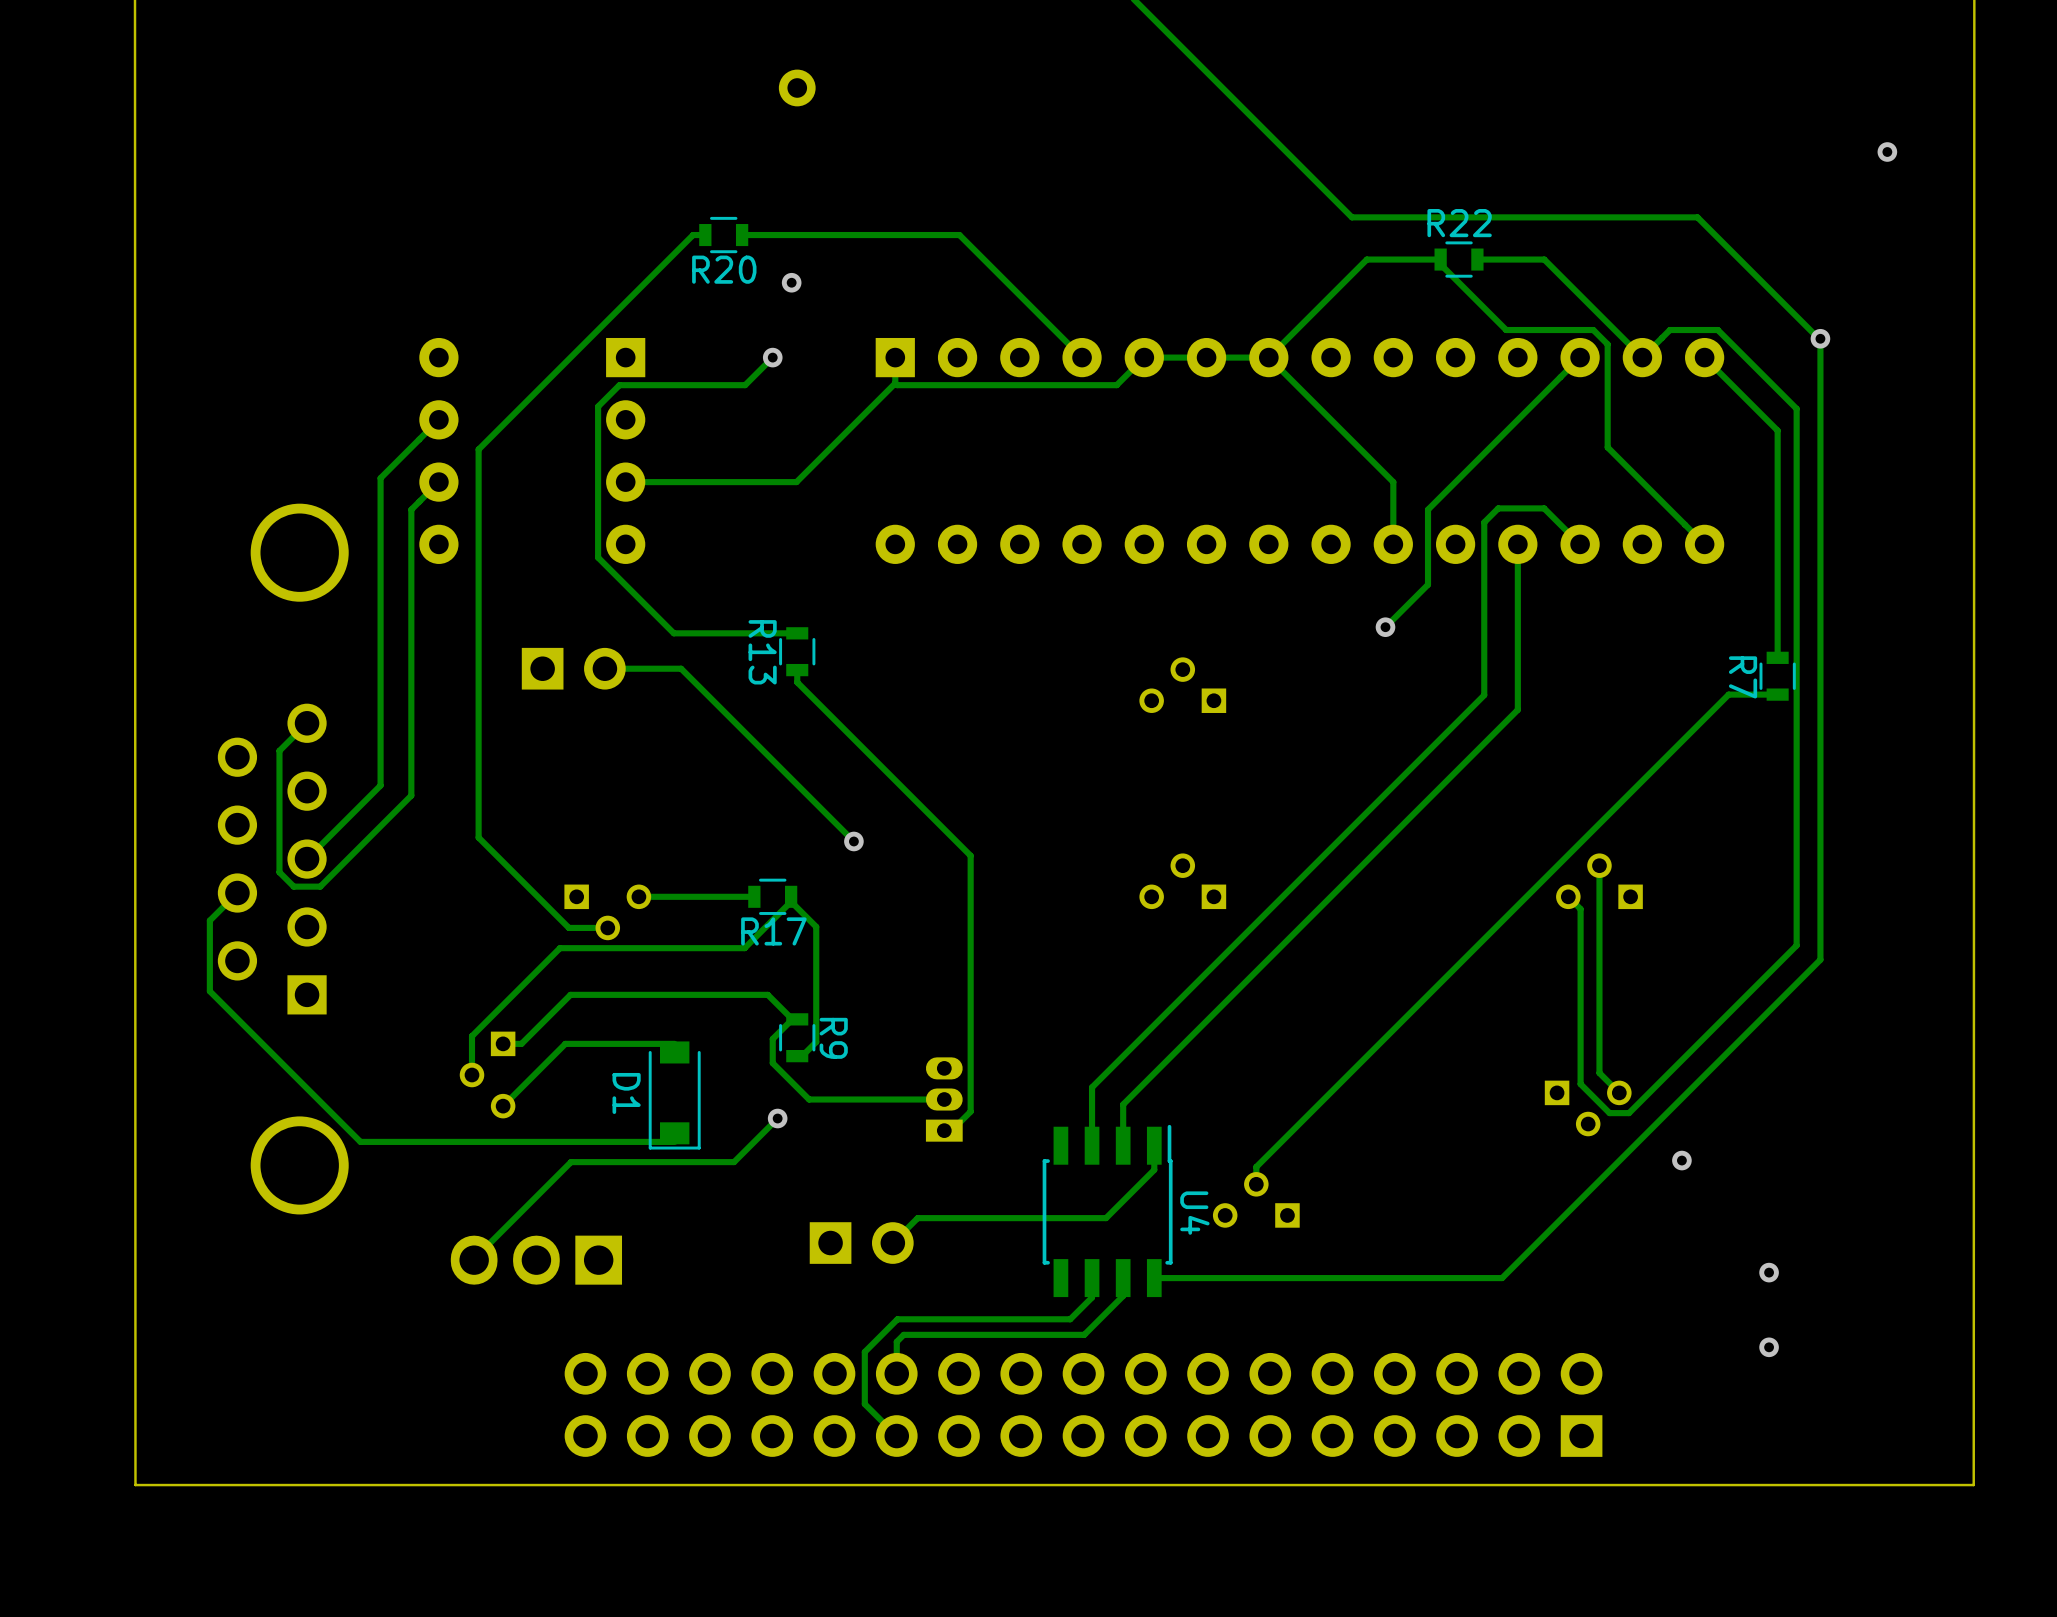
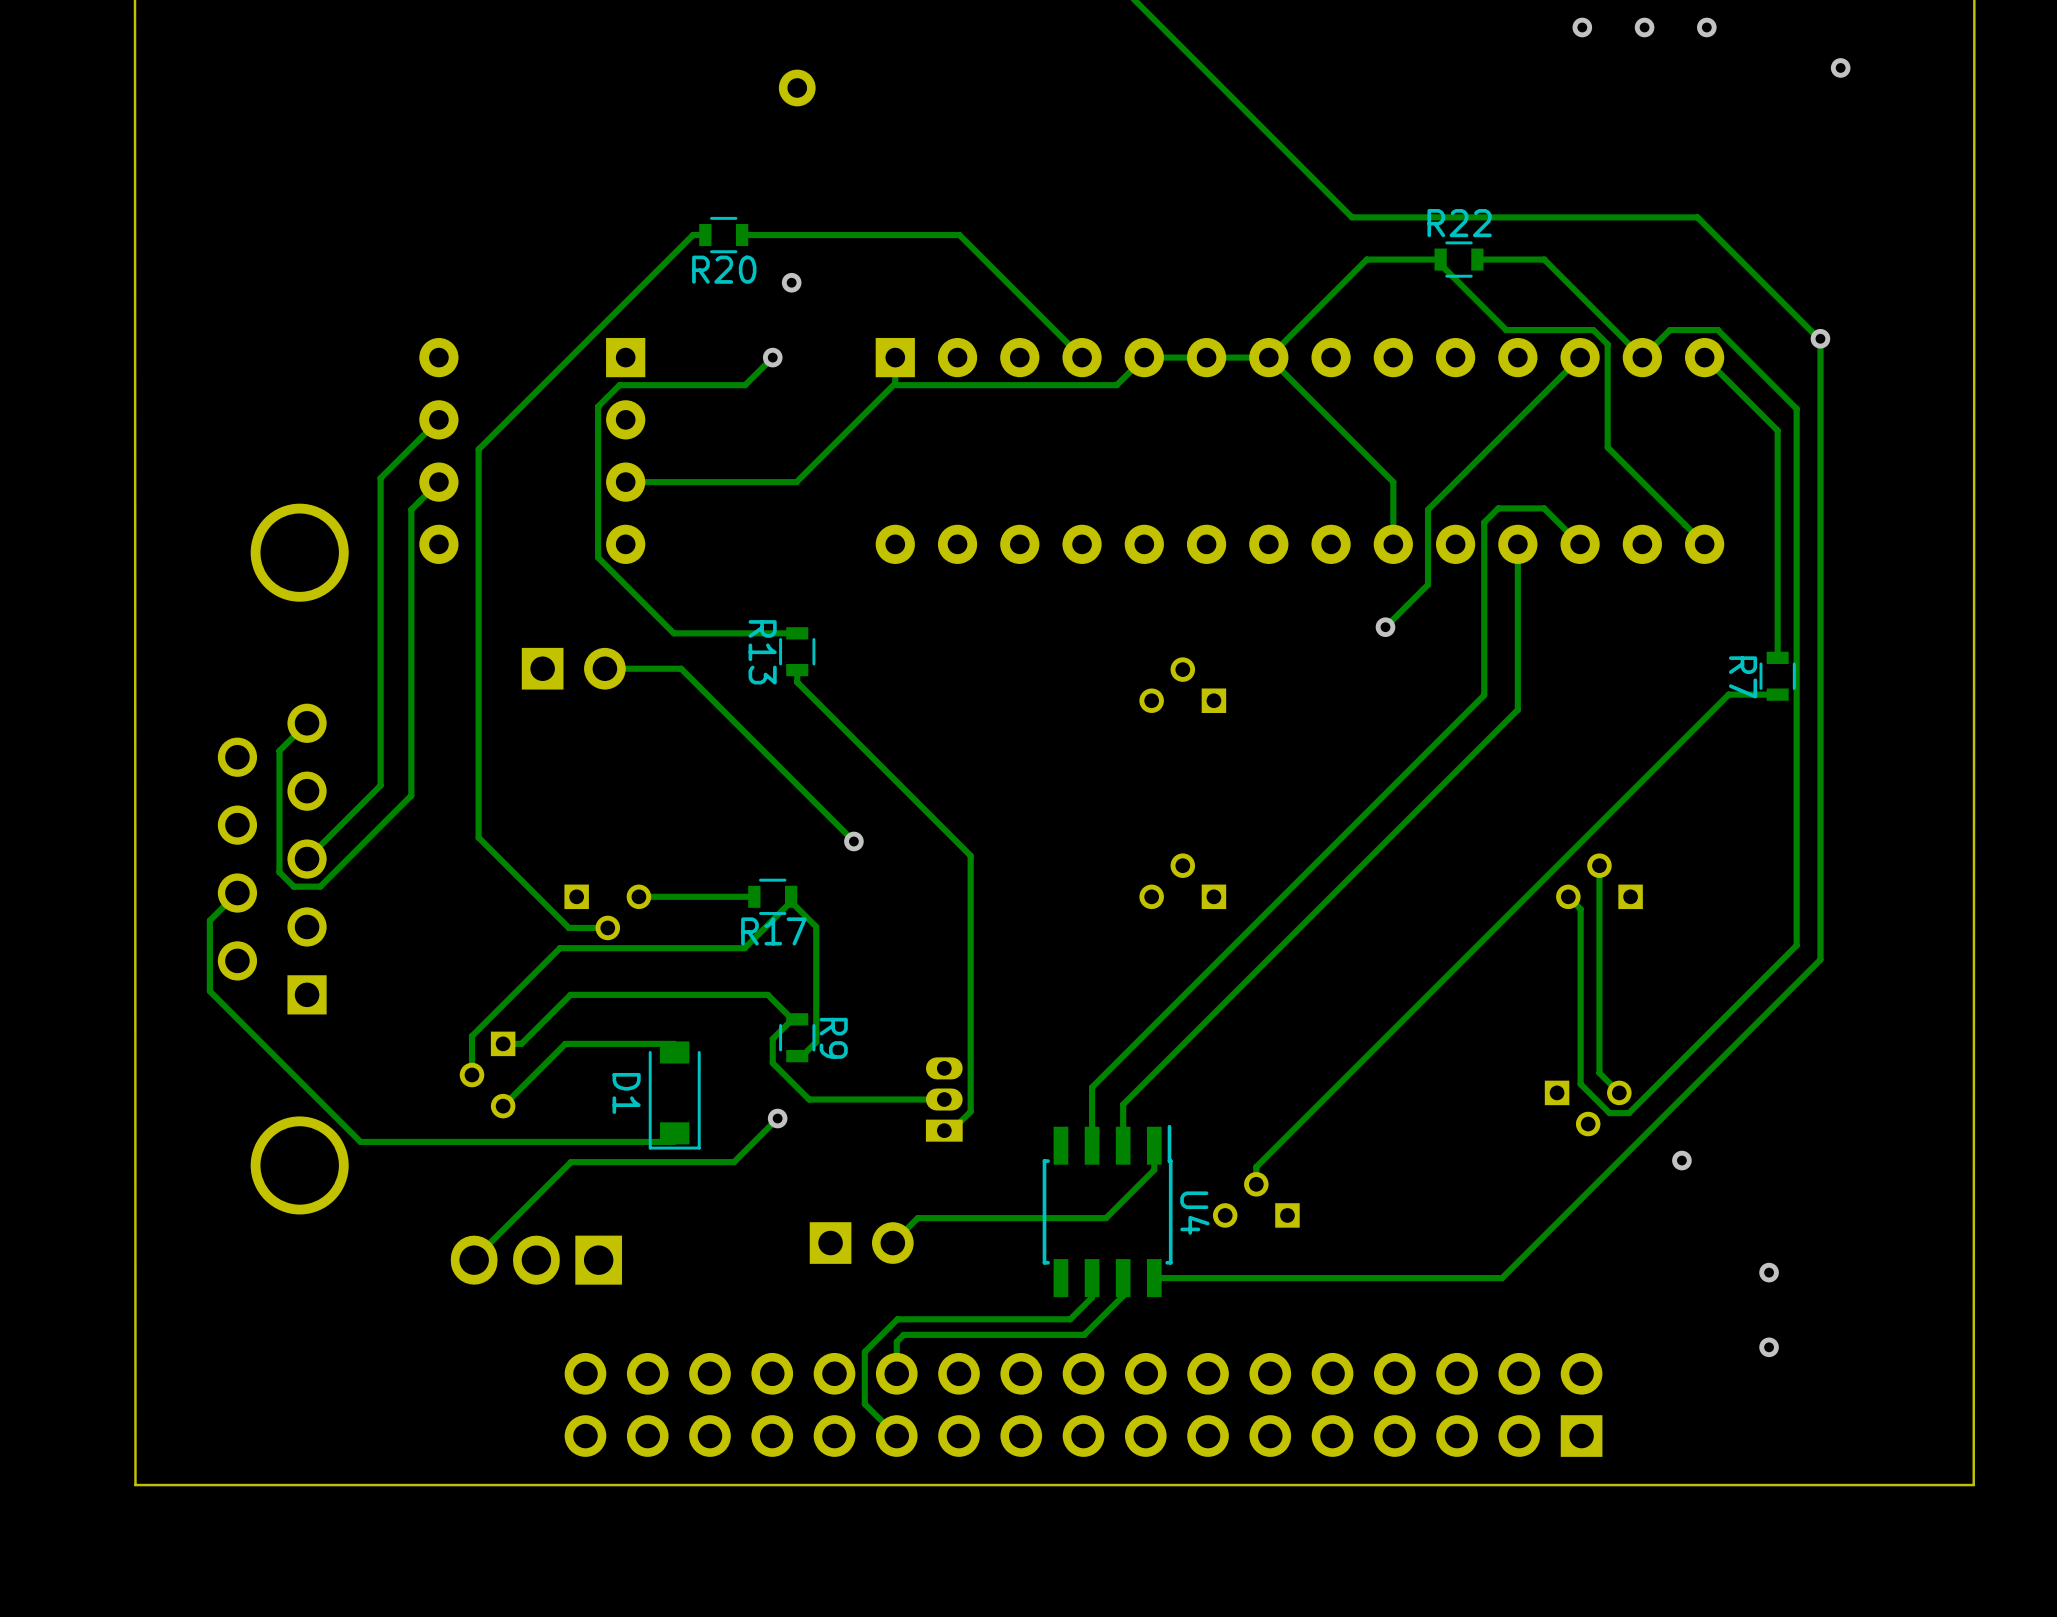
via: none -> (1582, 27)
via: none -> (1644, 27)
via: none -> (1706, 27)
via position: (1887, 152) -> (1840, 67)

